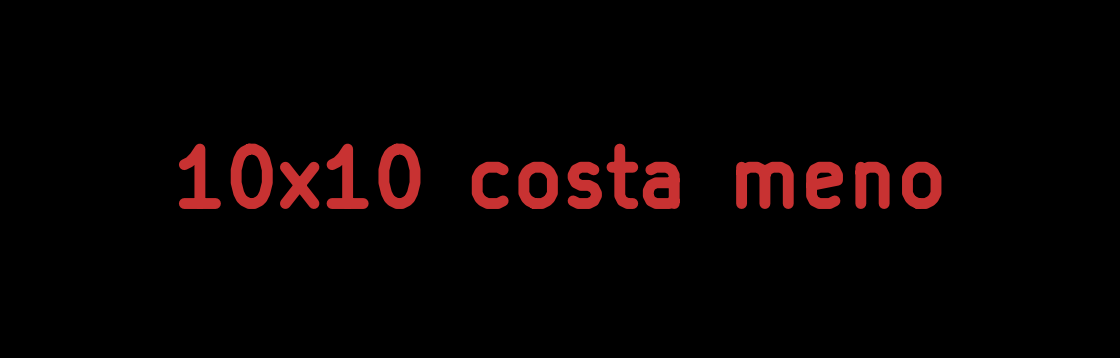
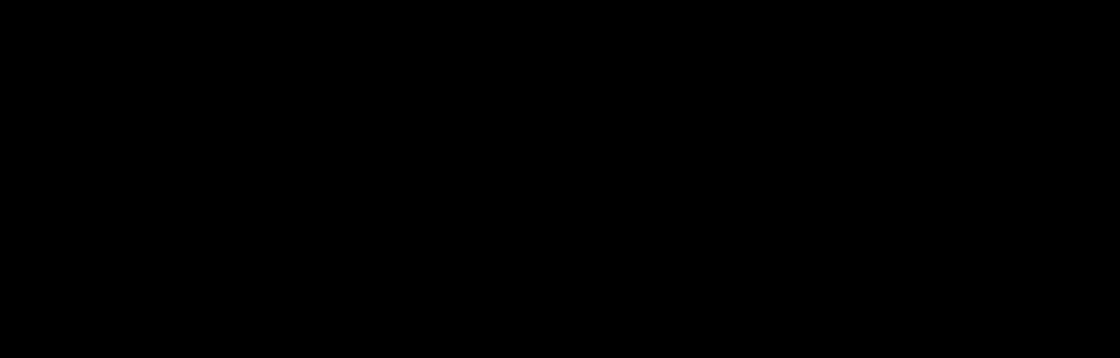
text: 10x10 costa meno (560, 176) -> none

